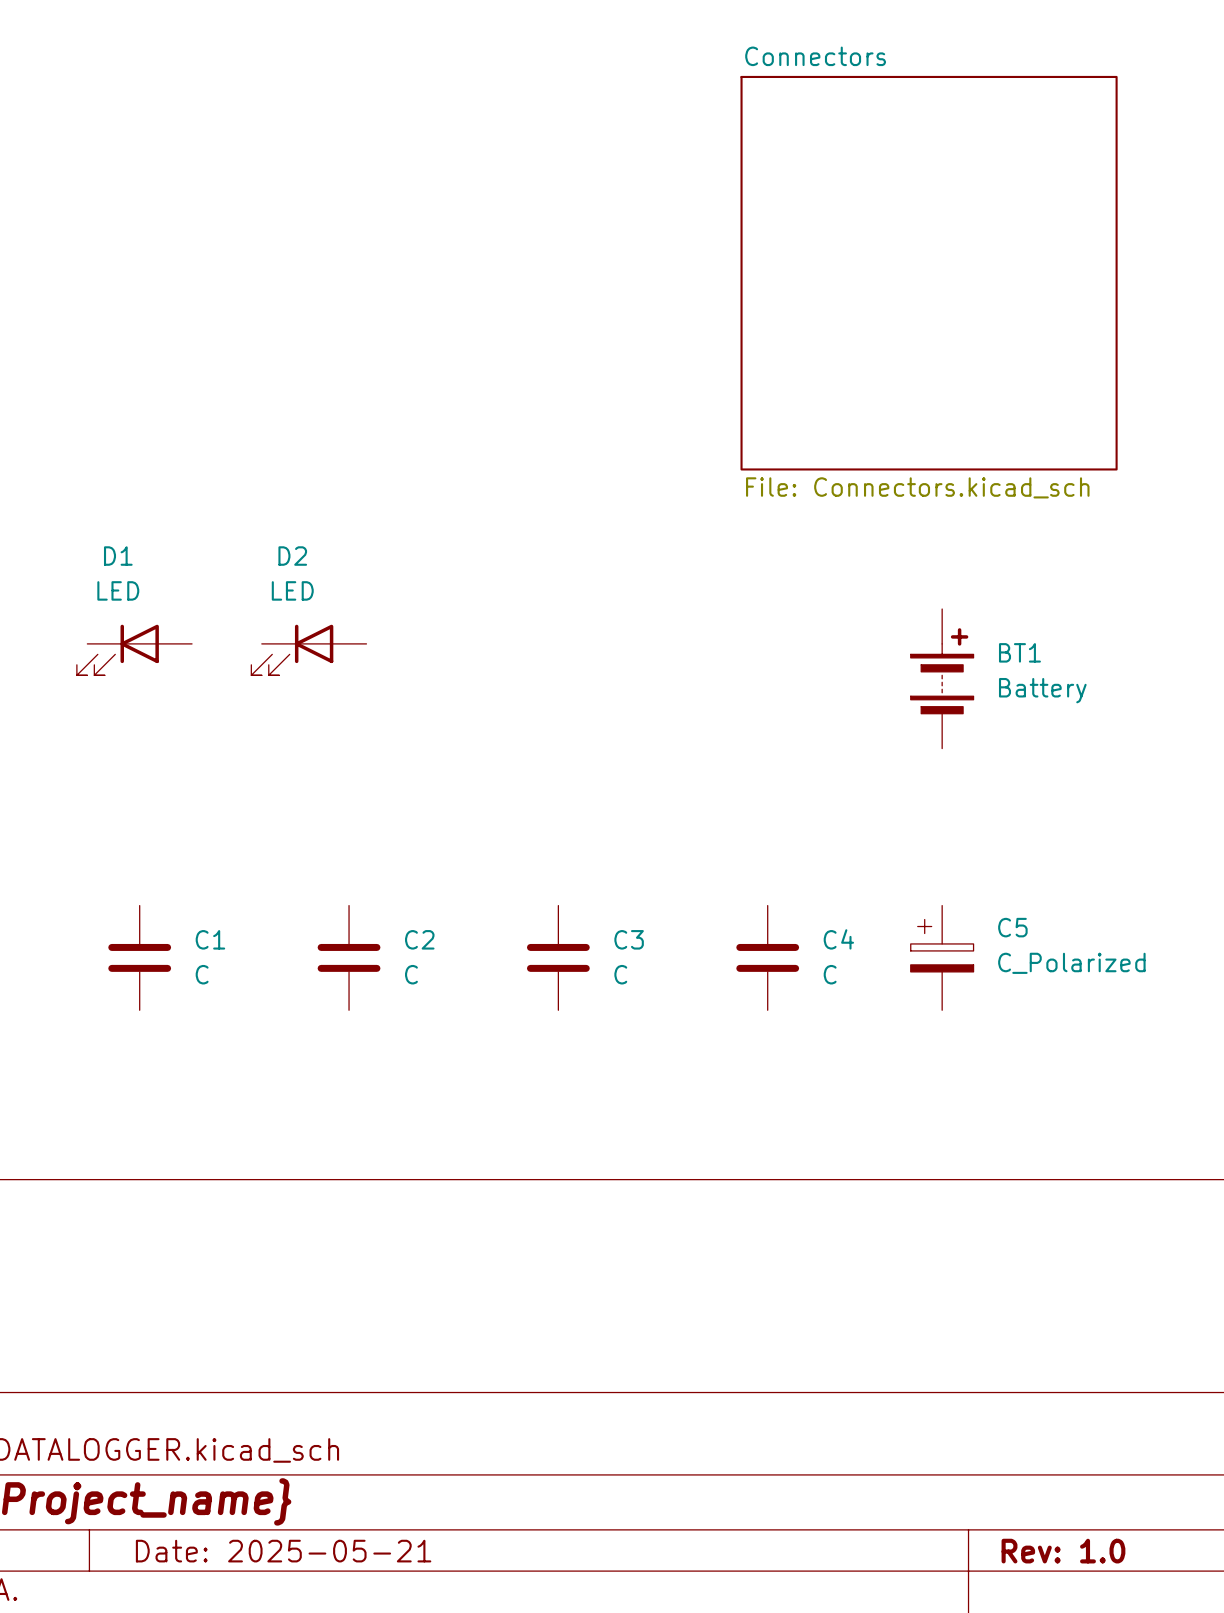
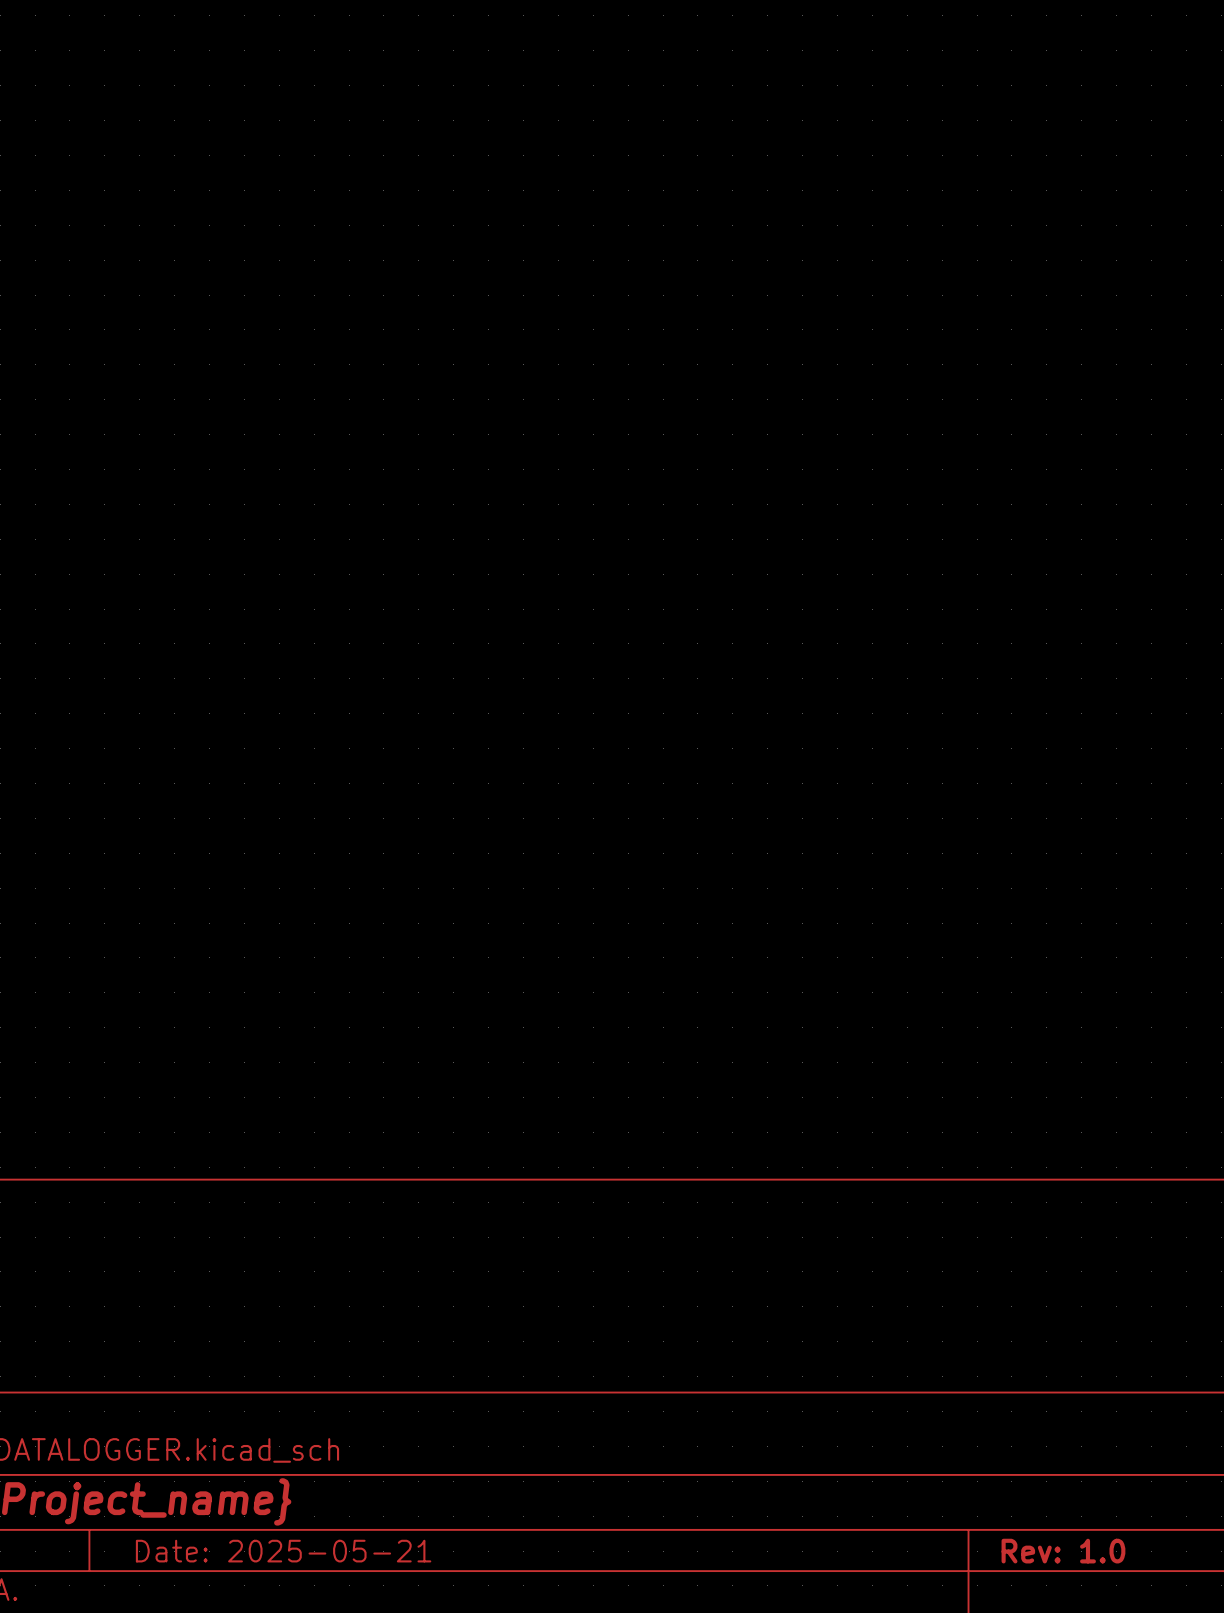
sheet Connectors: File: Connectors.kicad_sch (929, 273) -> none
D1: LED (134, 650) -> none
D2: LED (308, 650) -> none
BT1: Battery (942, 678) -> none
C1: C (139, 957) -> none
C2: C (349, 957) -> none
C3: C (558, 957) -> none
C4: C (767, 957) -> none
C5: C_Polarized (942, 957) -> none

